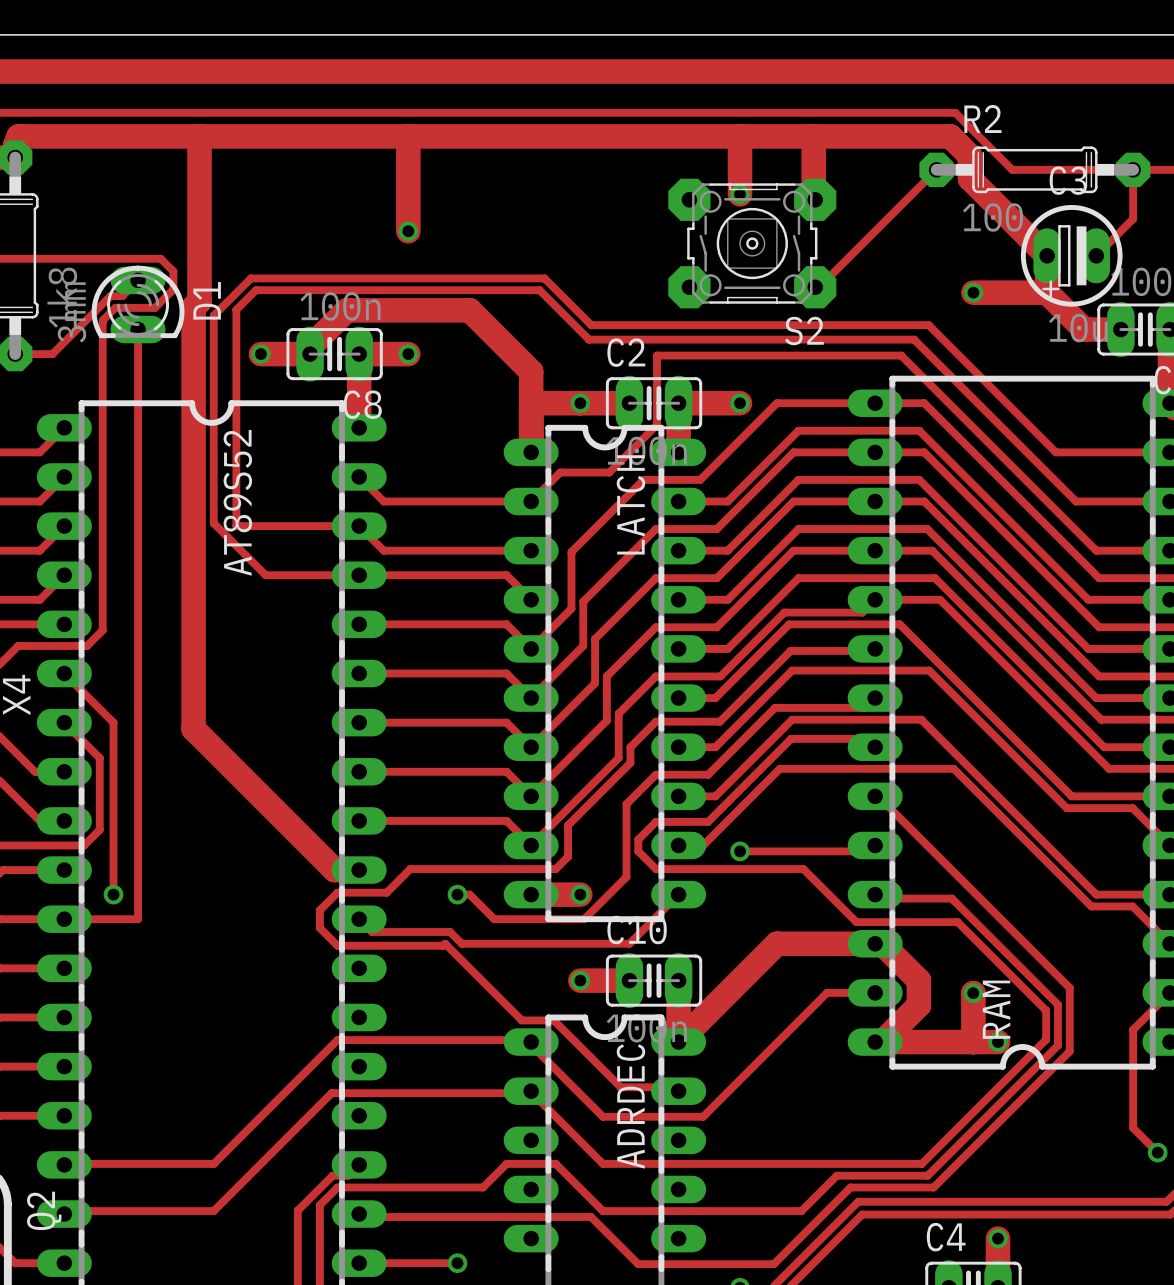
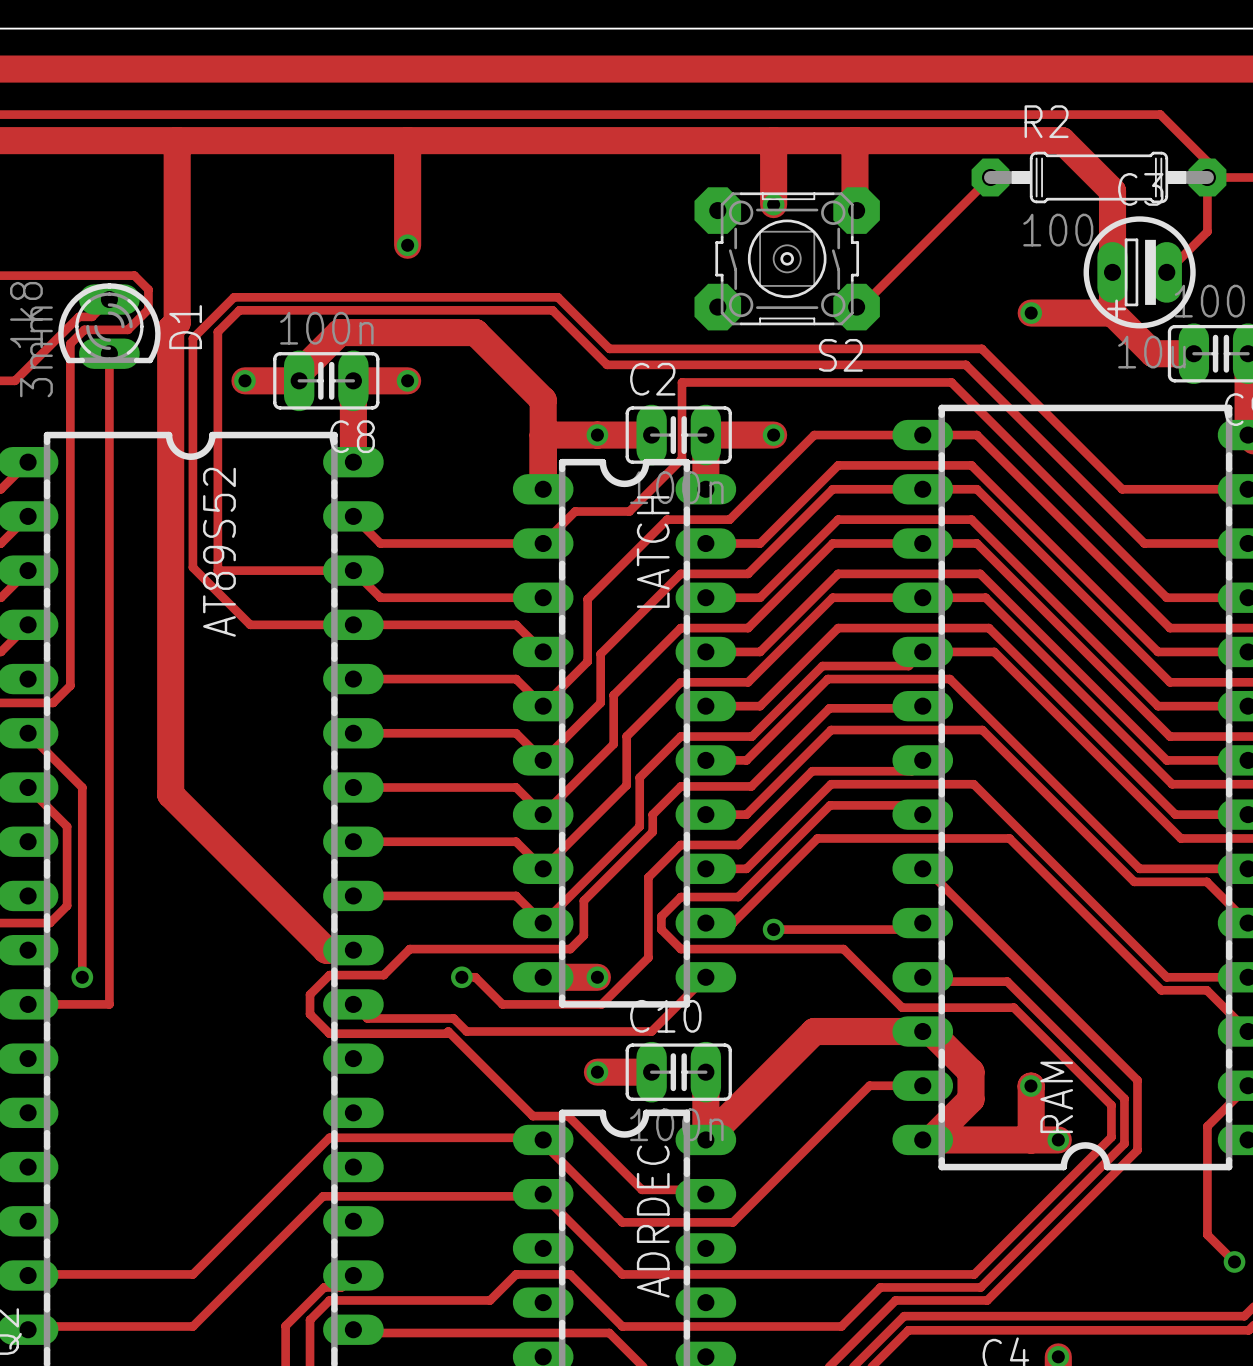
track: (955, 112) (1012, 169) (1133, 169) -> (1011, 114) (1160, 114) (1207, 161) (1207, 177)
track: (950, 136) (970, 155) (970, 178) (1047, 255) -> (1005, 140) (1062, 140) (1112, 191) (1112, 272)

